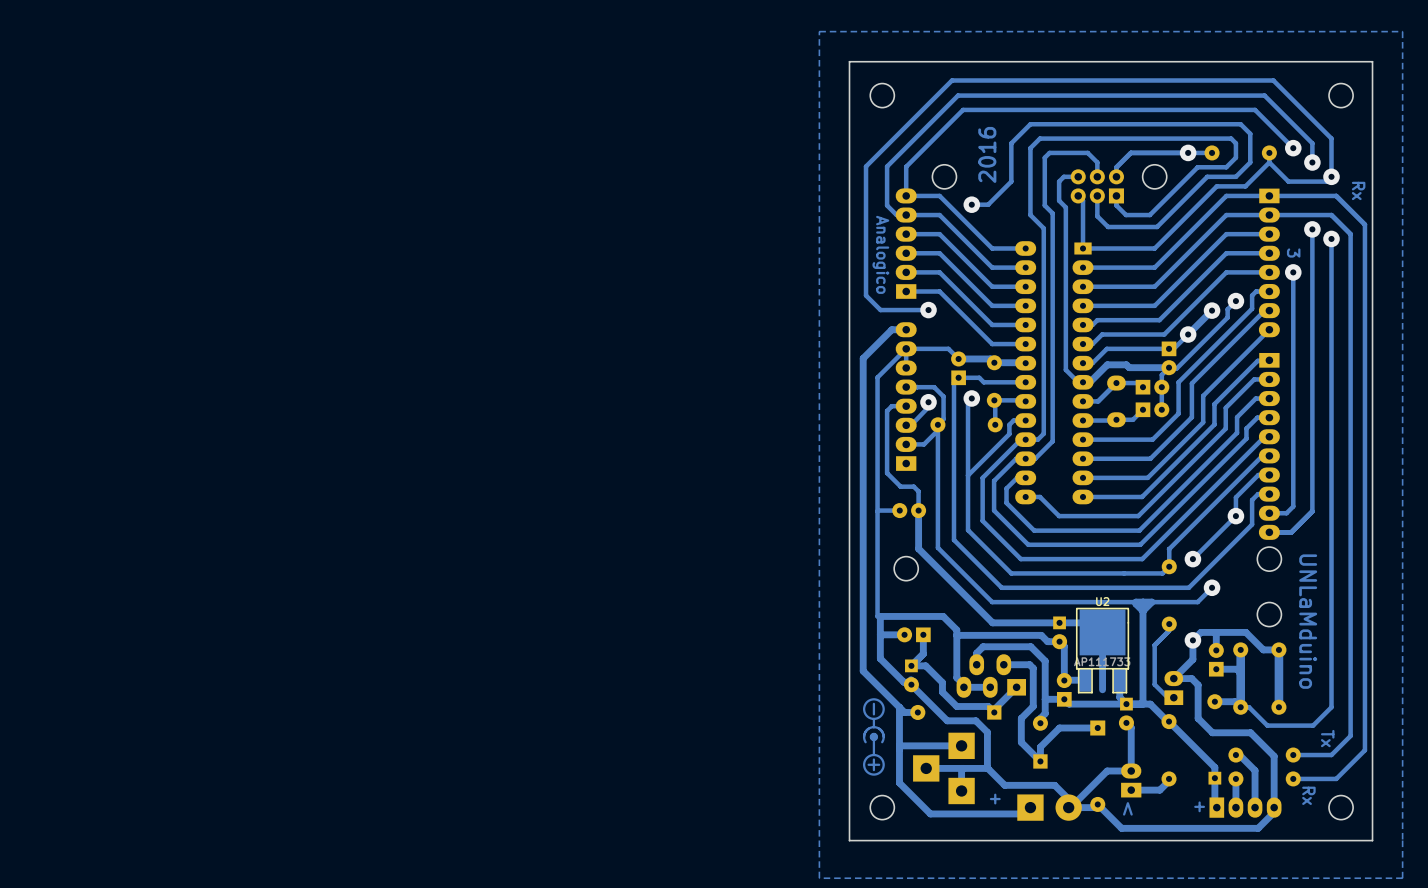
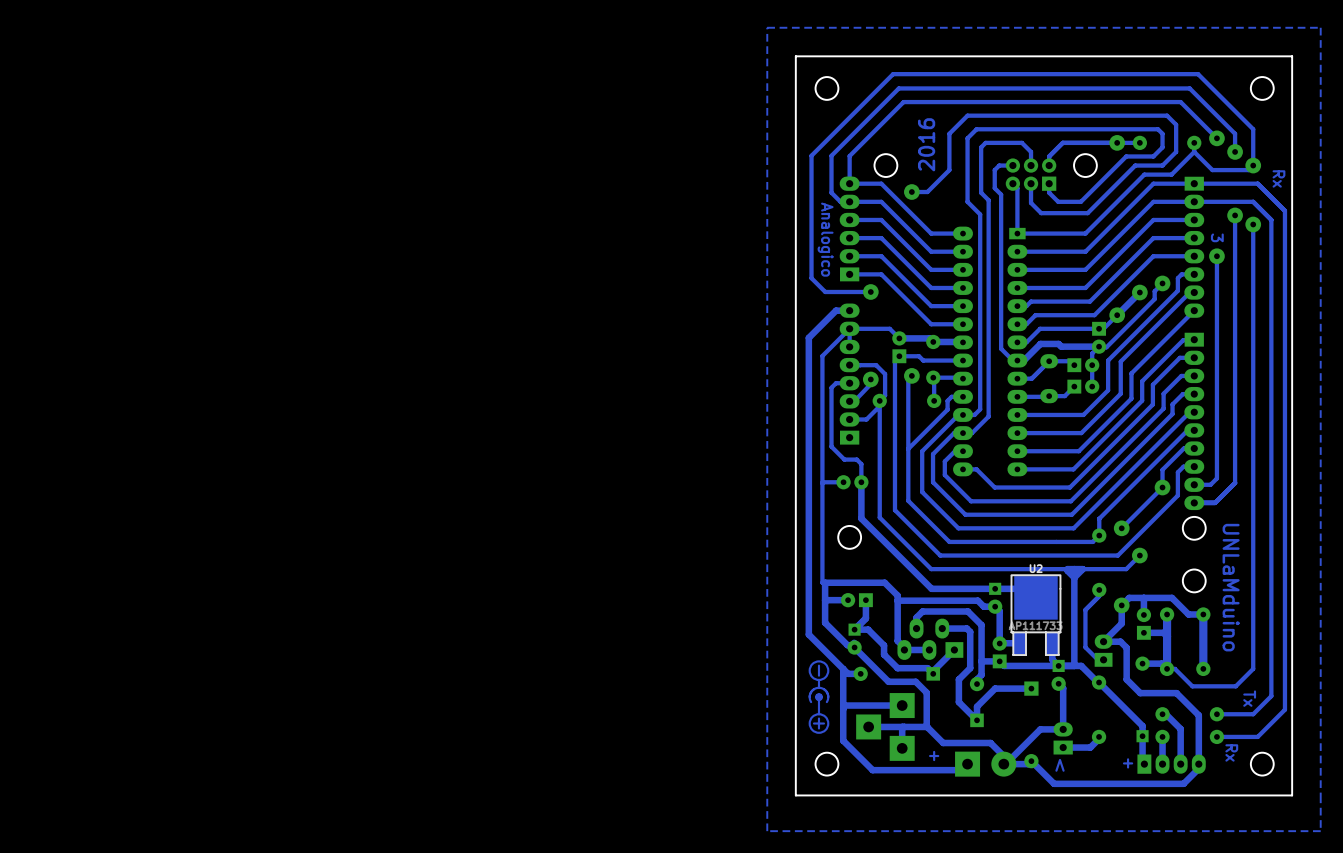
track: (1102, 632) (1102, 689) -> none

